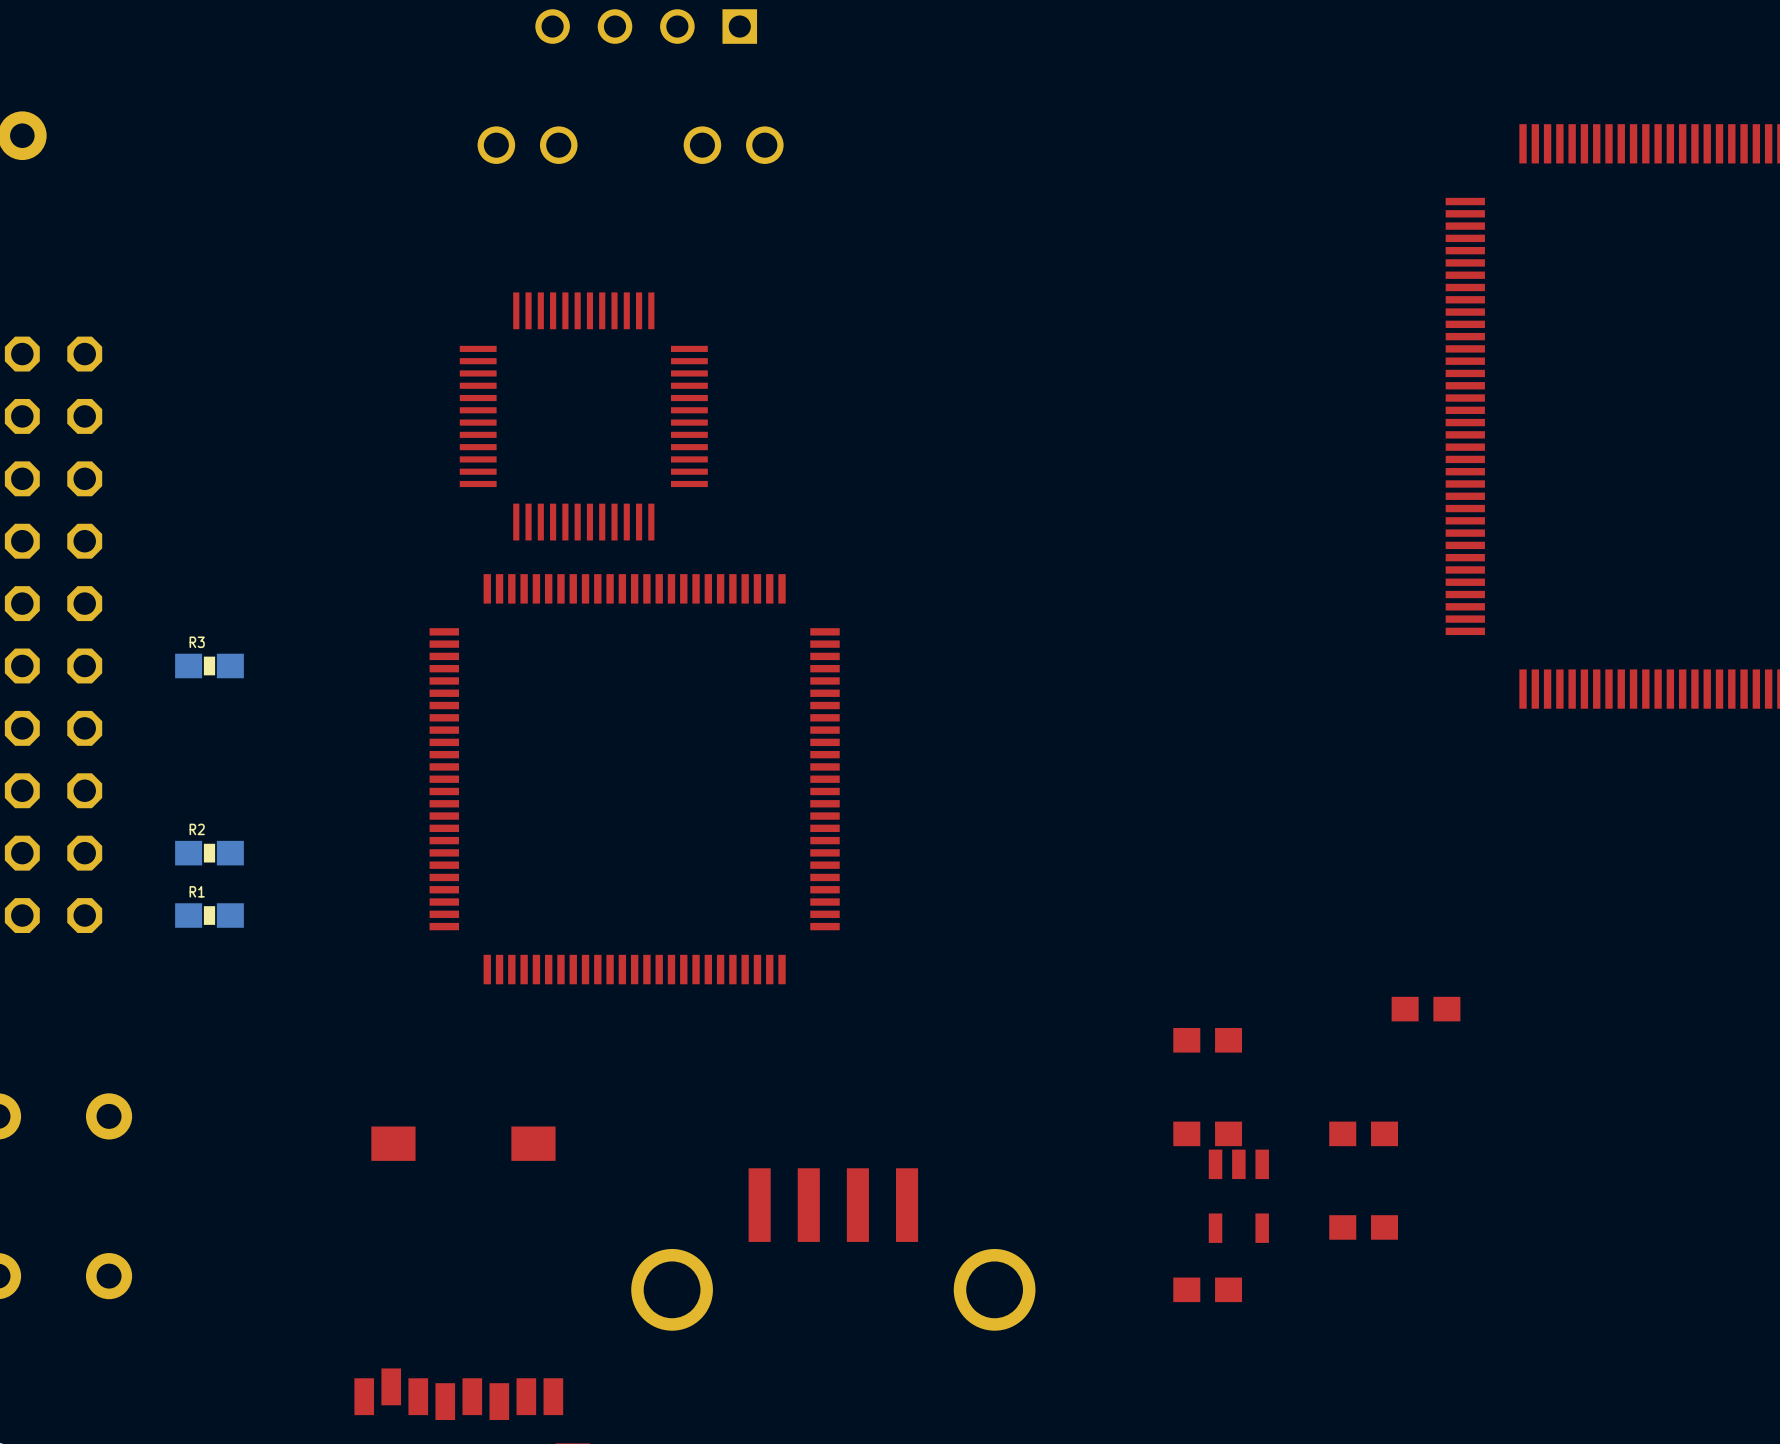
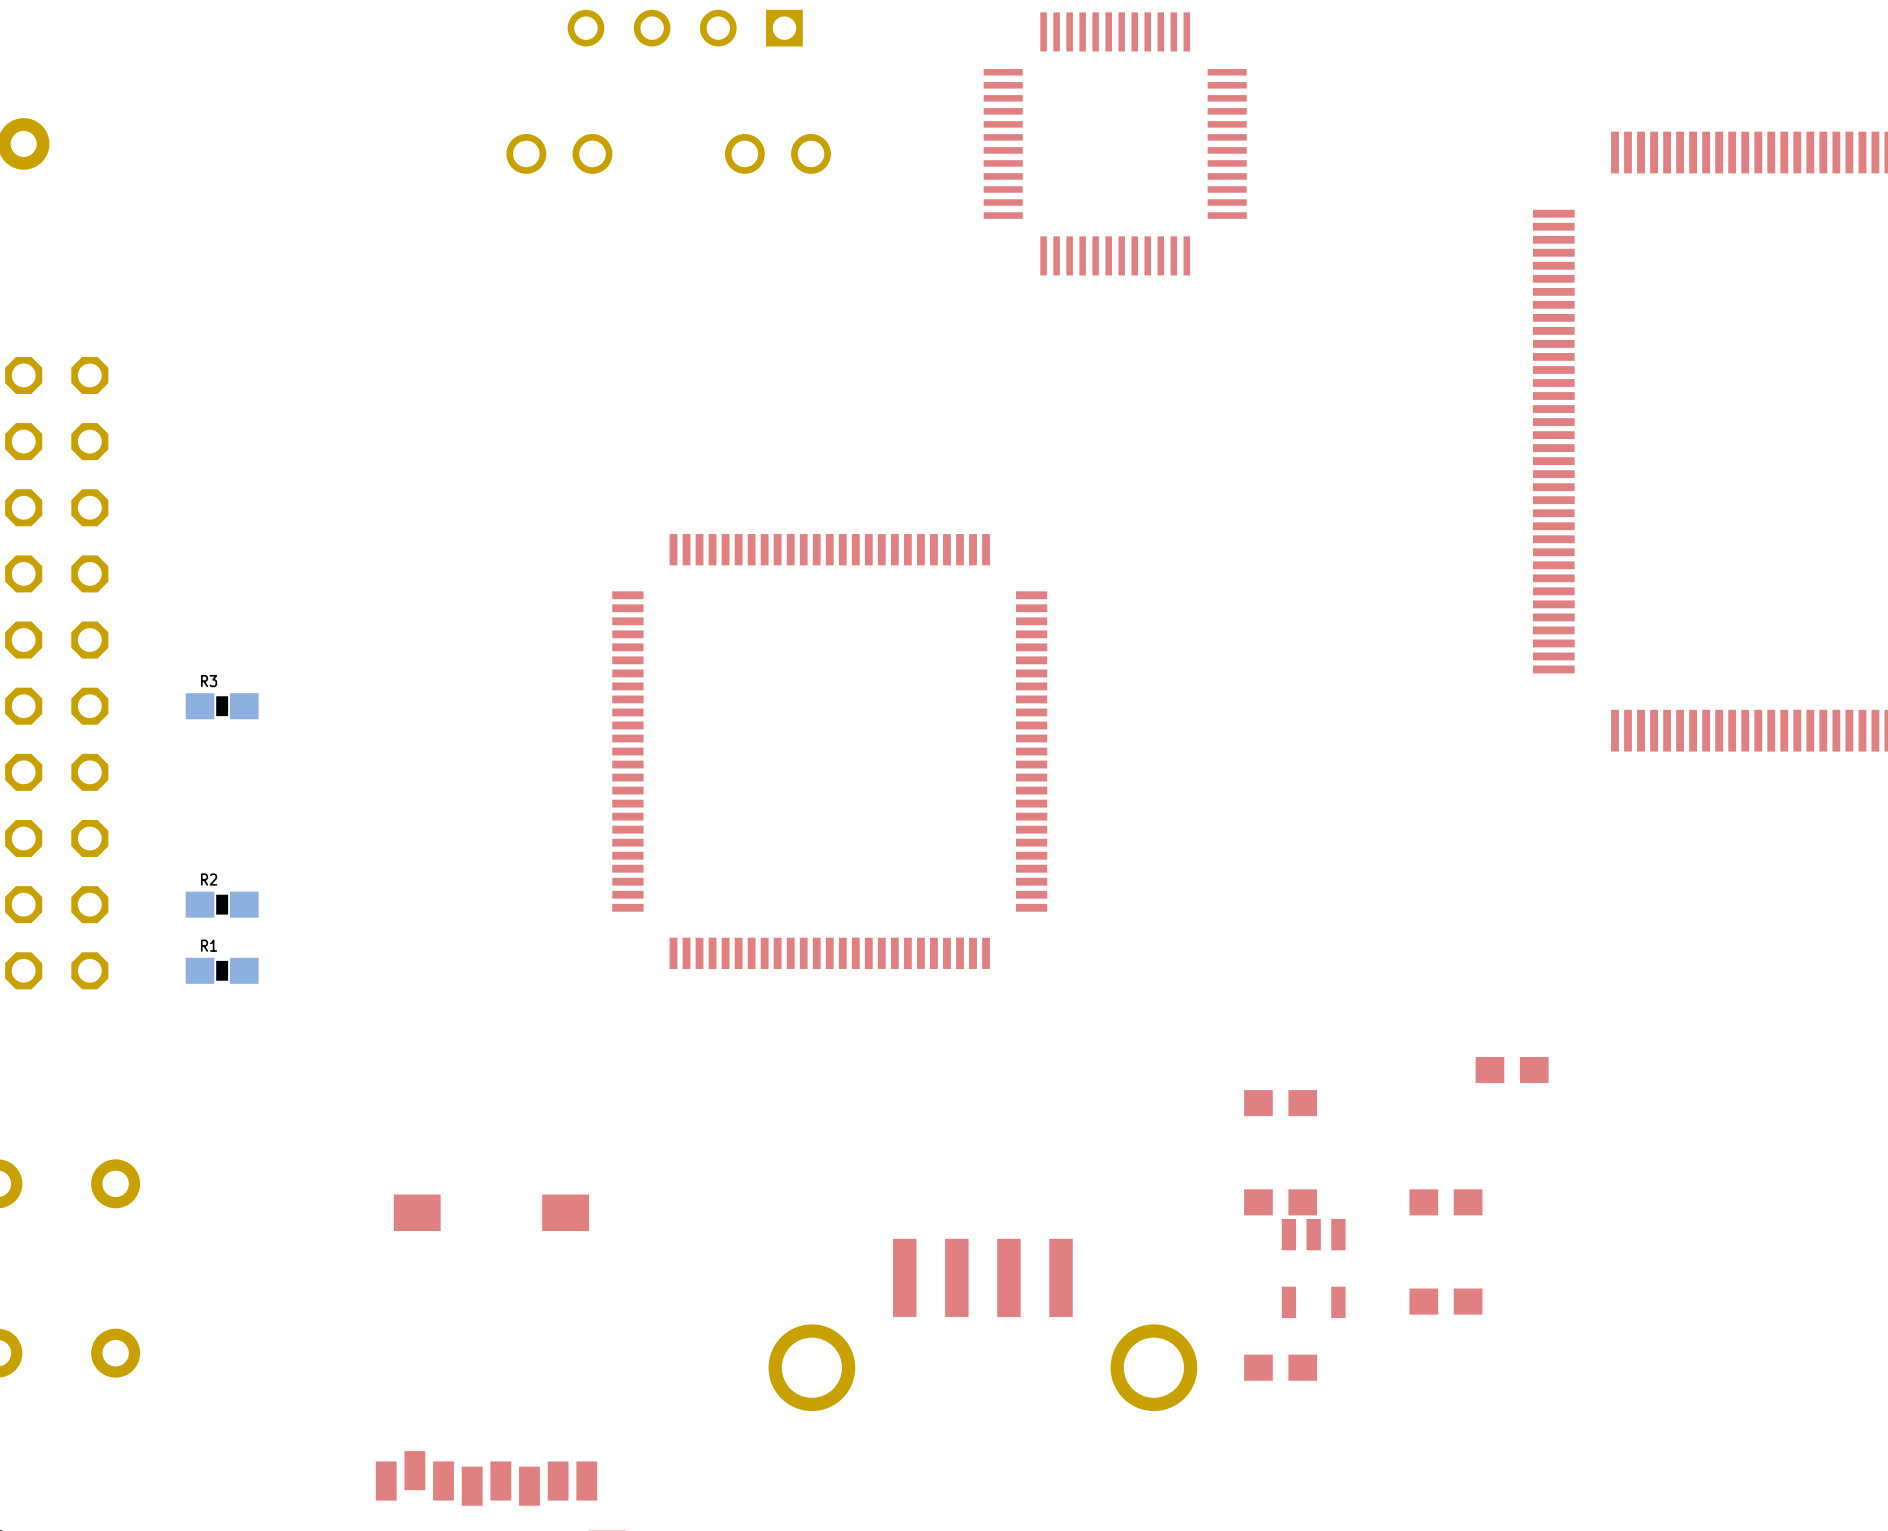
part position: (583, 416) -> (1115, 143)
part position: (634, 779) -> (829, 751)
part position: (833, 1249) -> (982, 1324)

